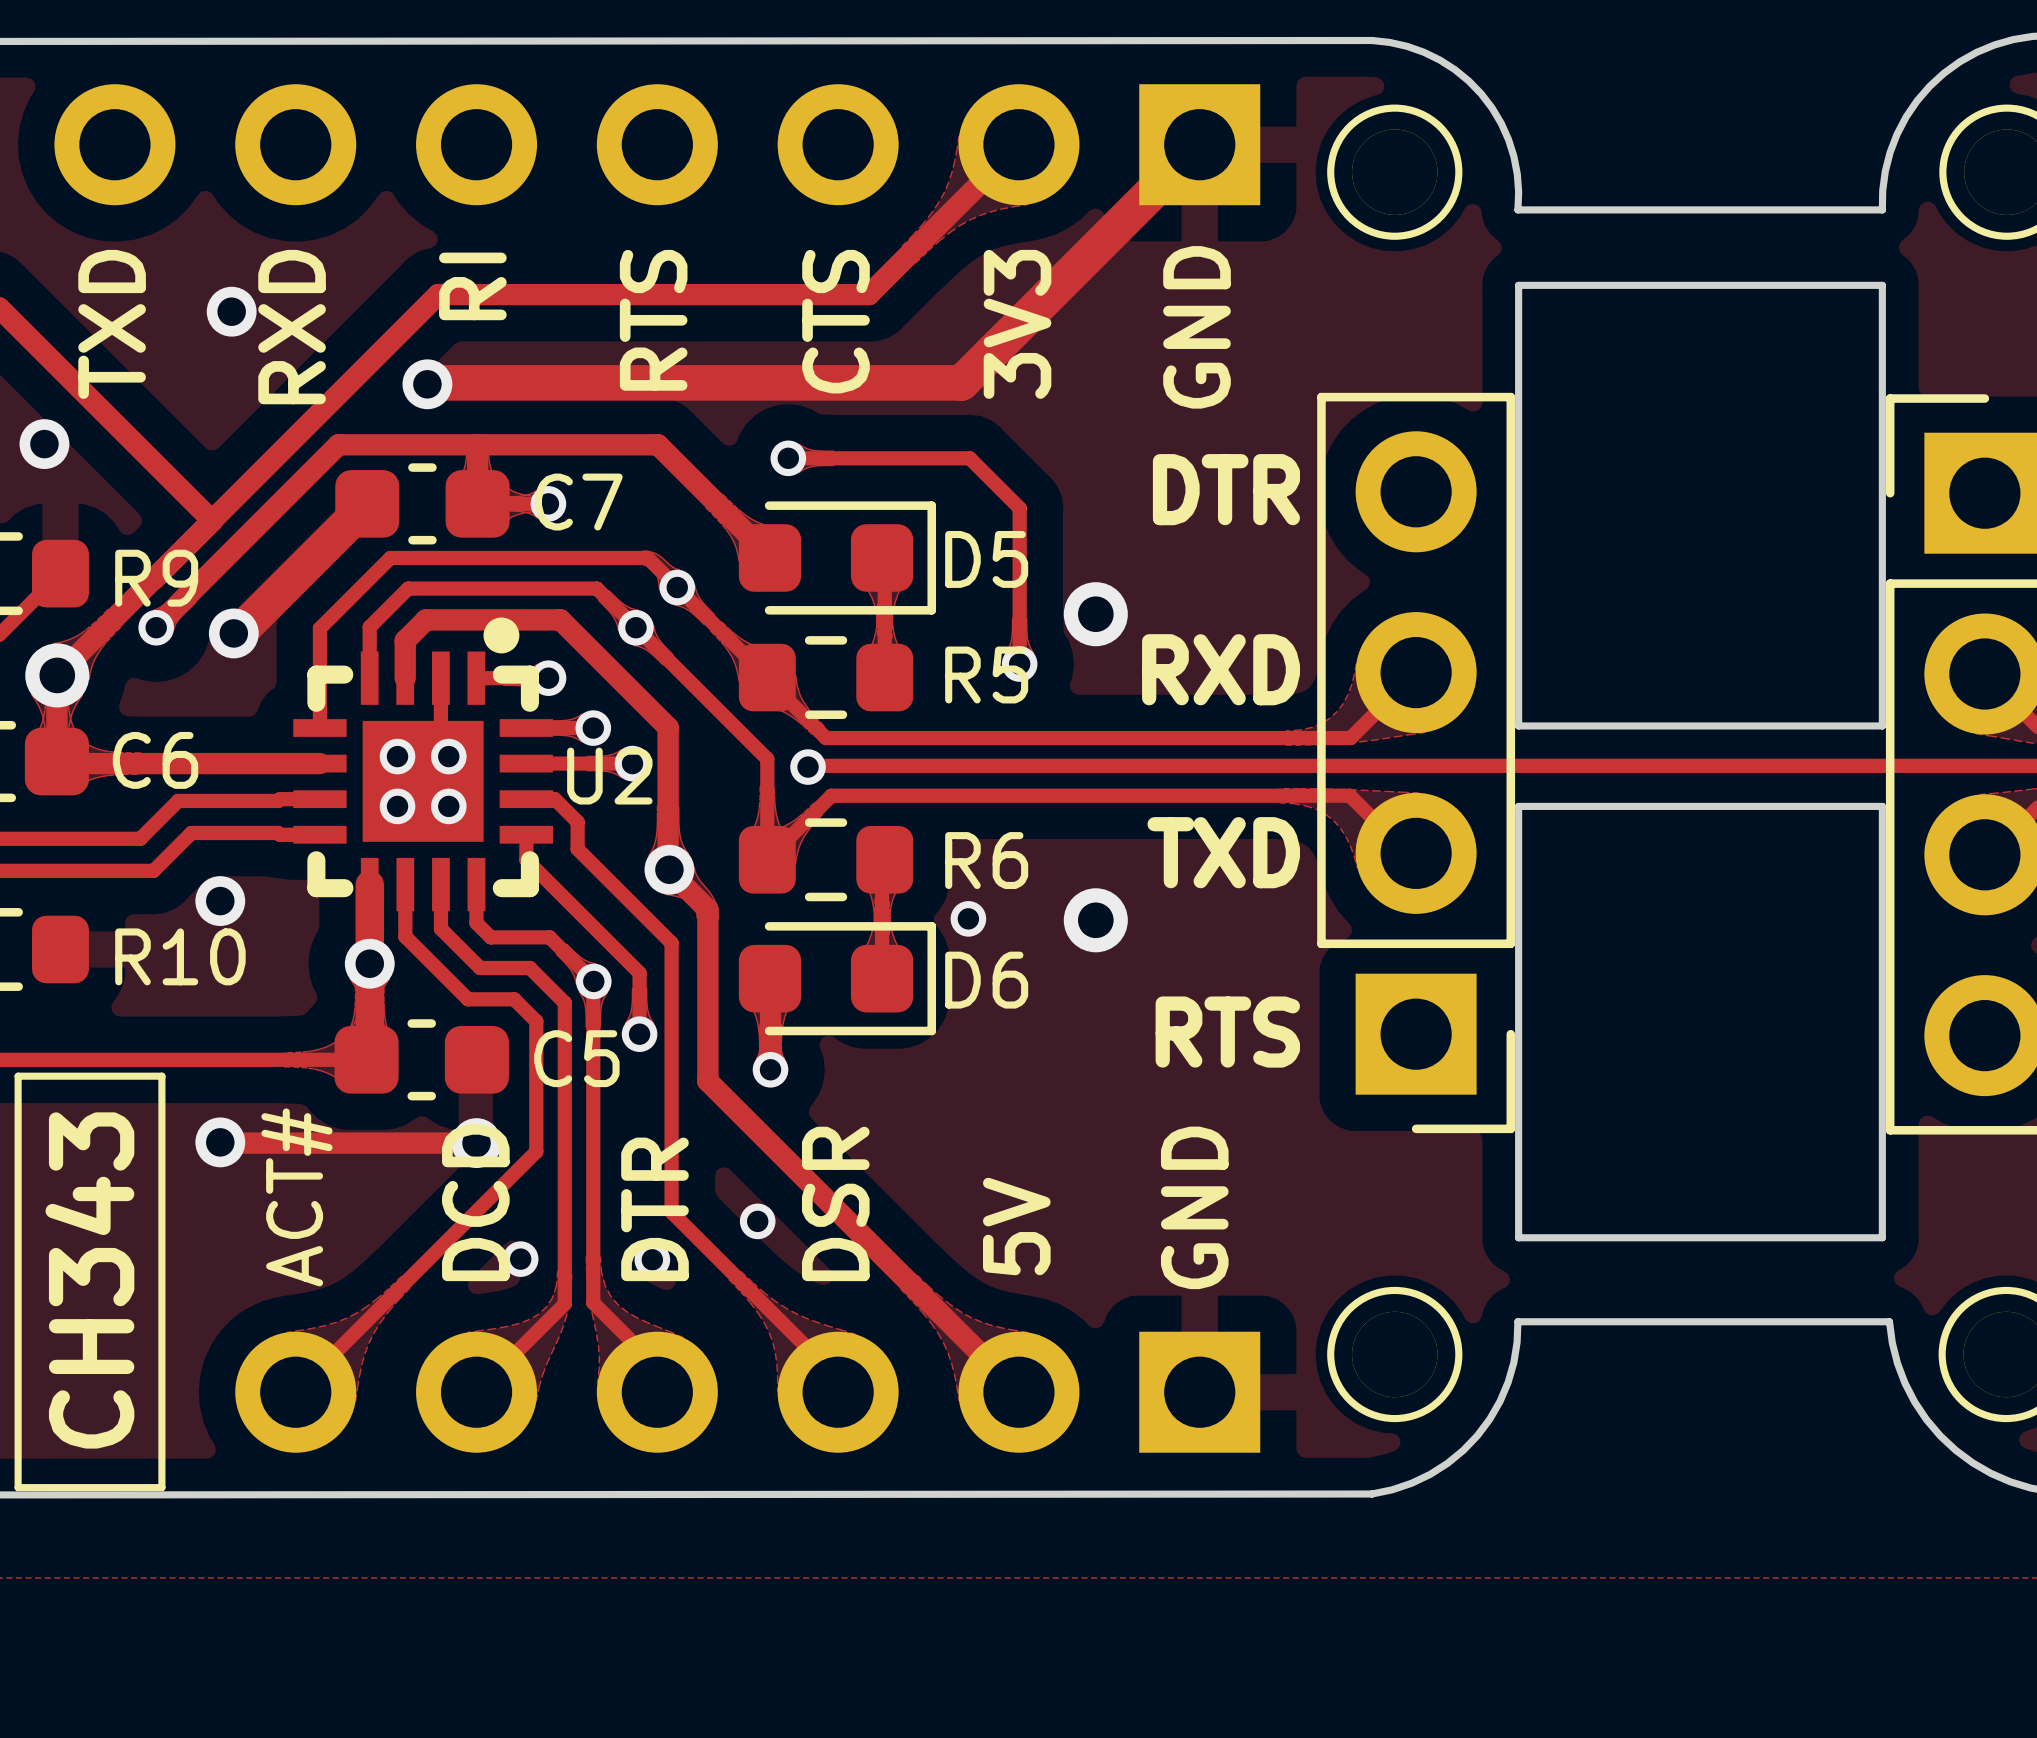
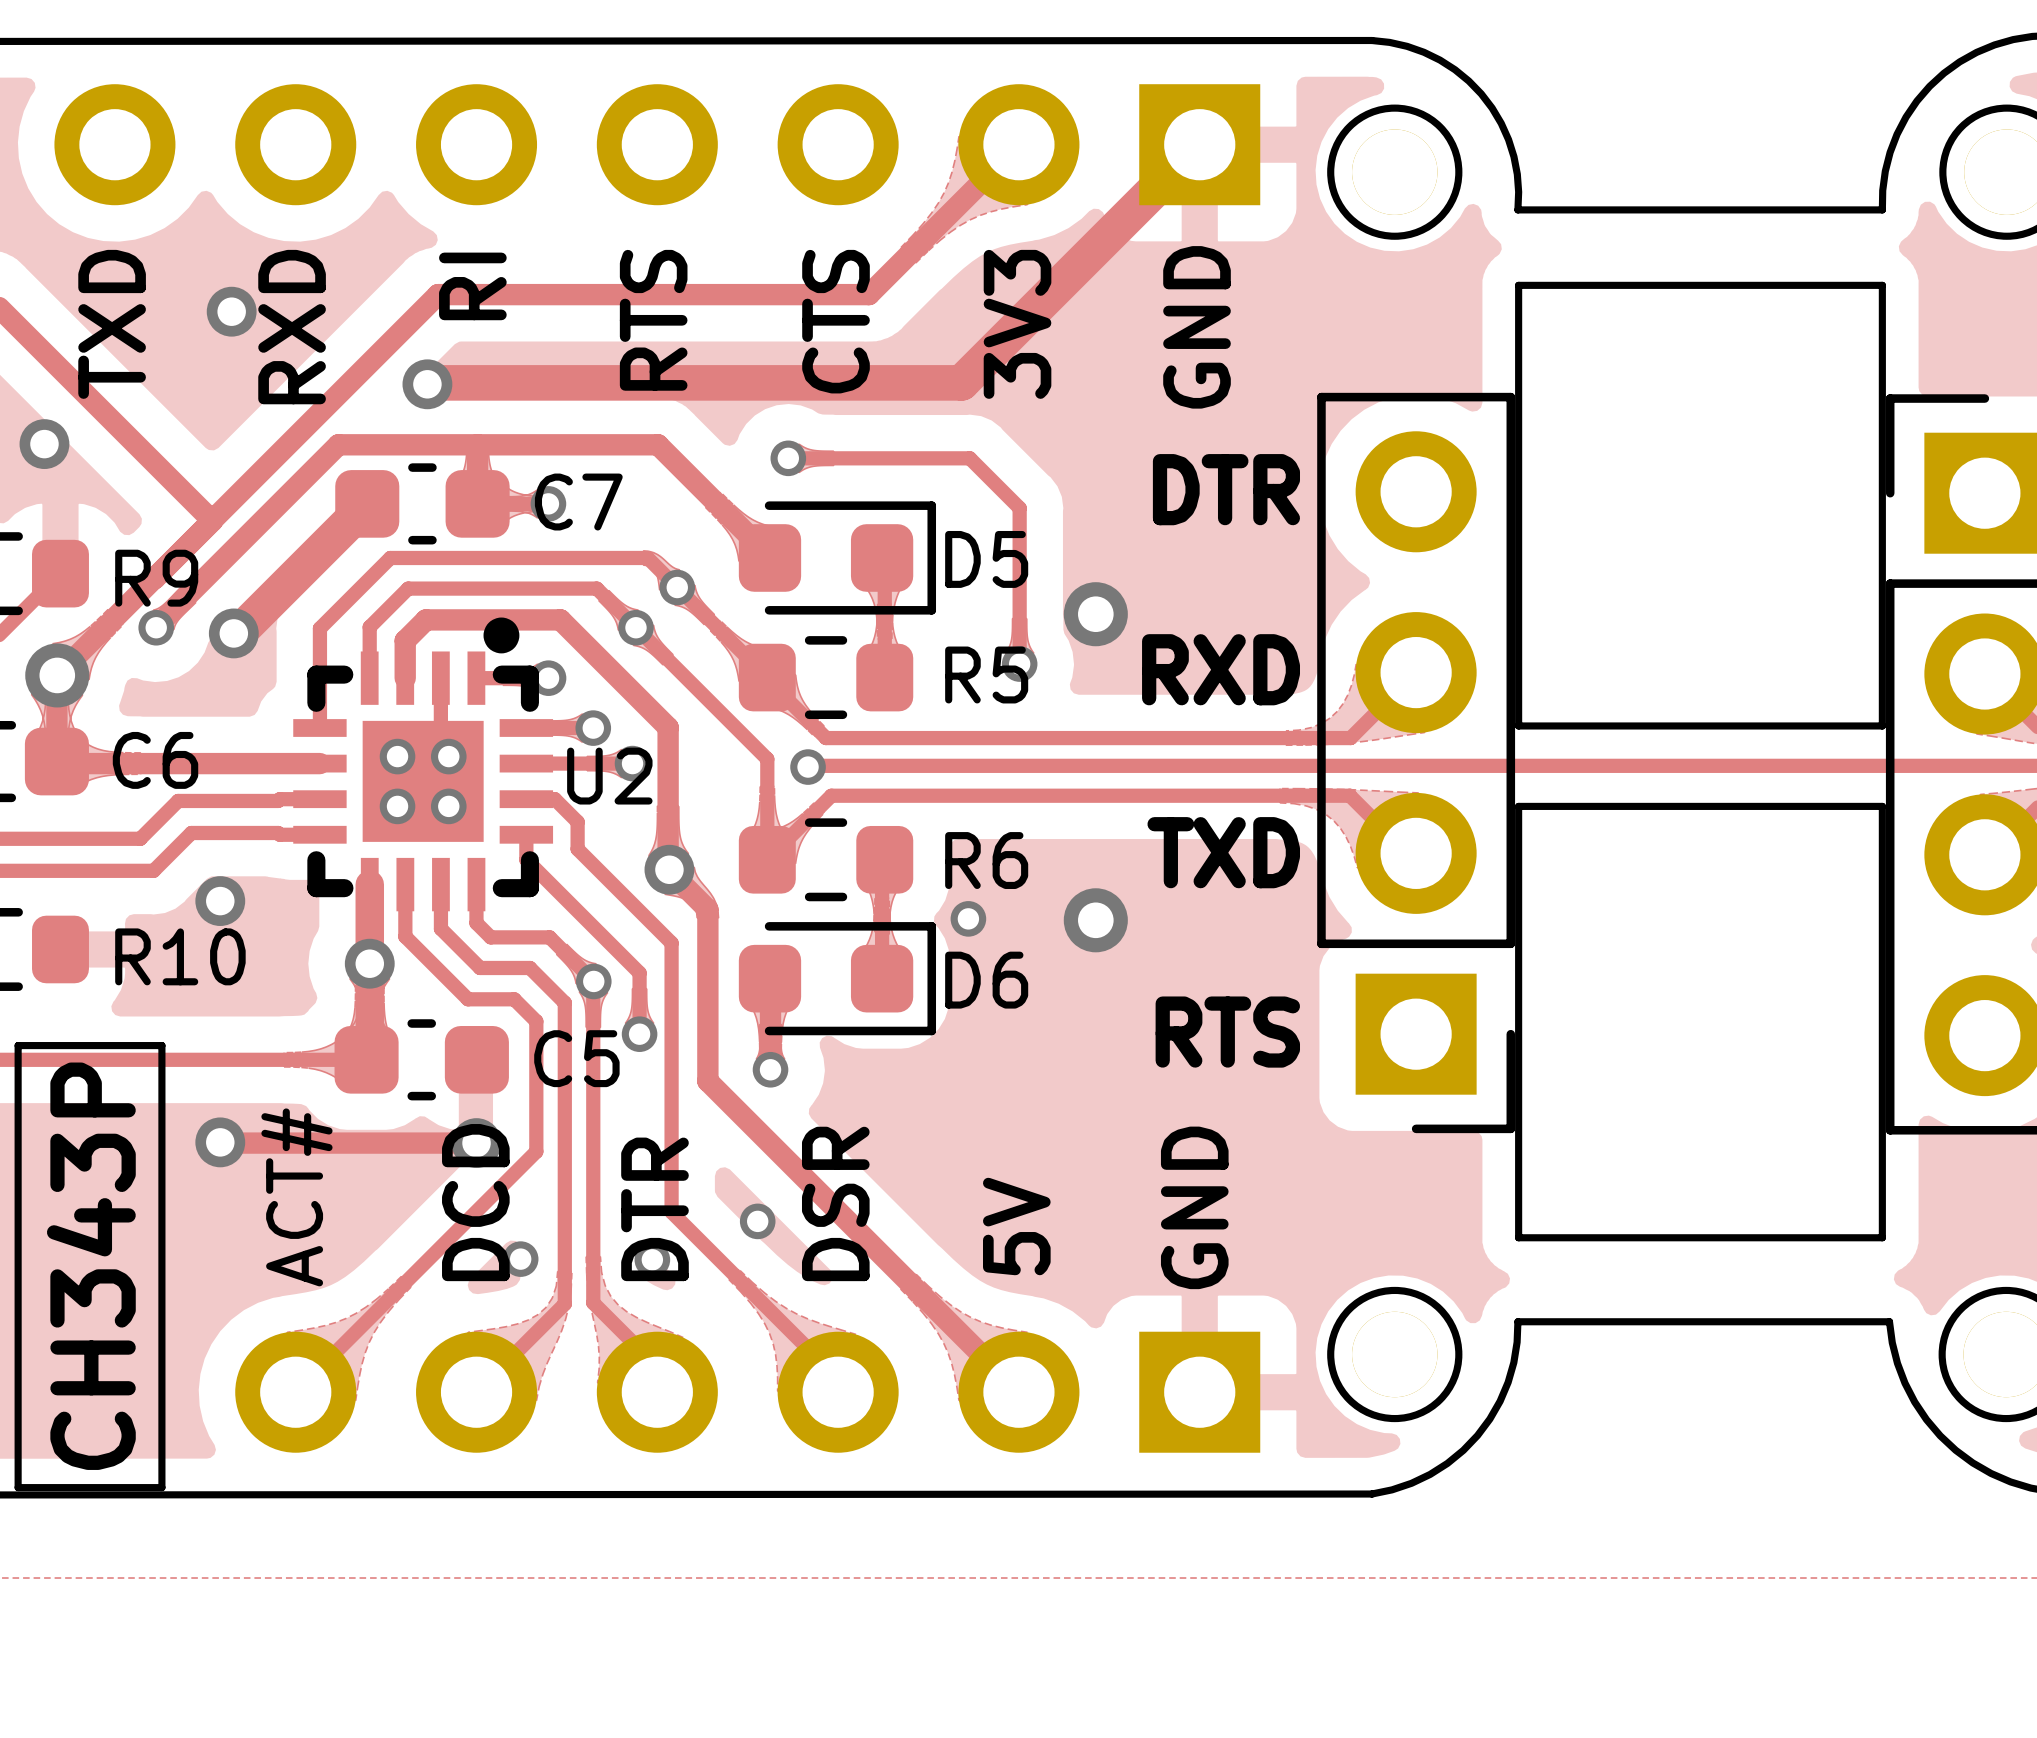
line: (18, 1076) (161, 1076) -> (18, 1076) (18, 1045) (161, 1045) (161, 1076)
text: CH343 (89, 1280) -> CH343P (91, 1266)

